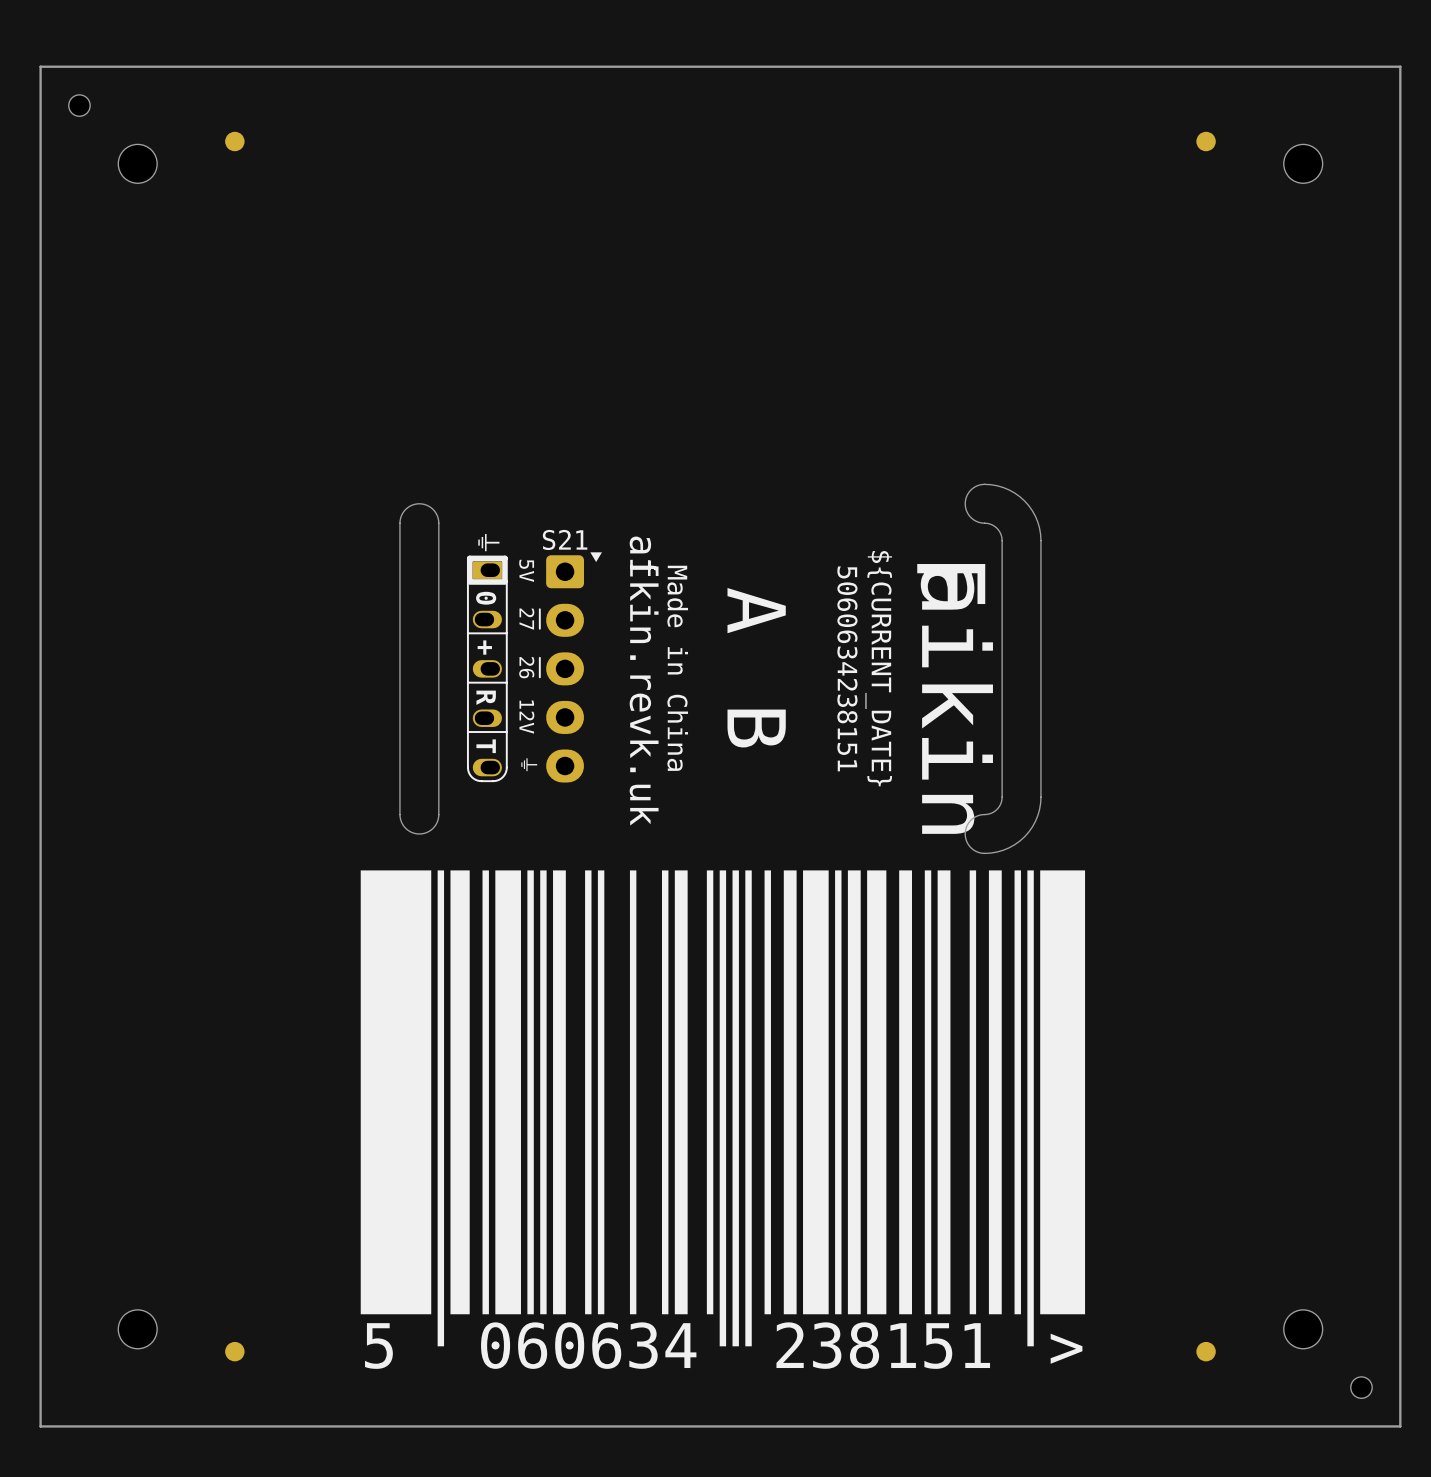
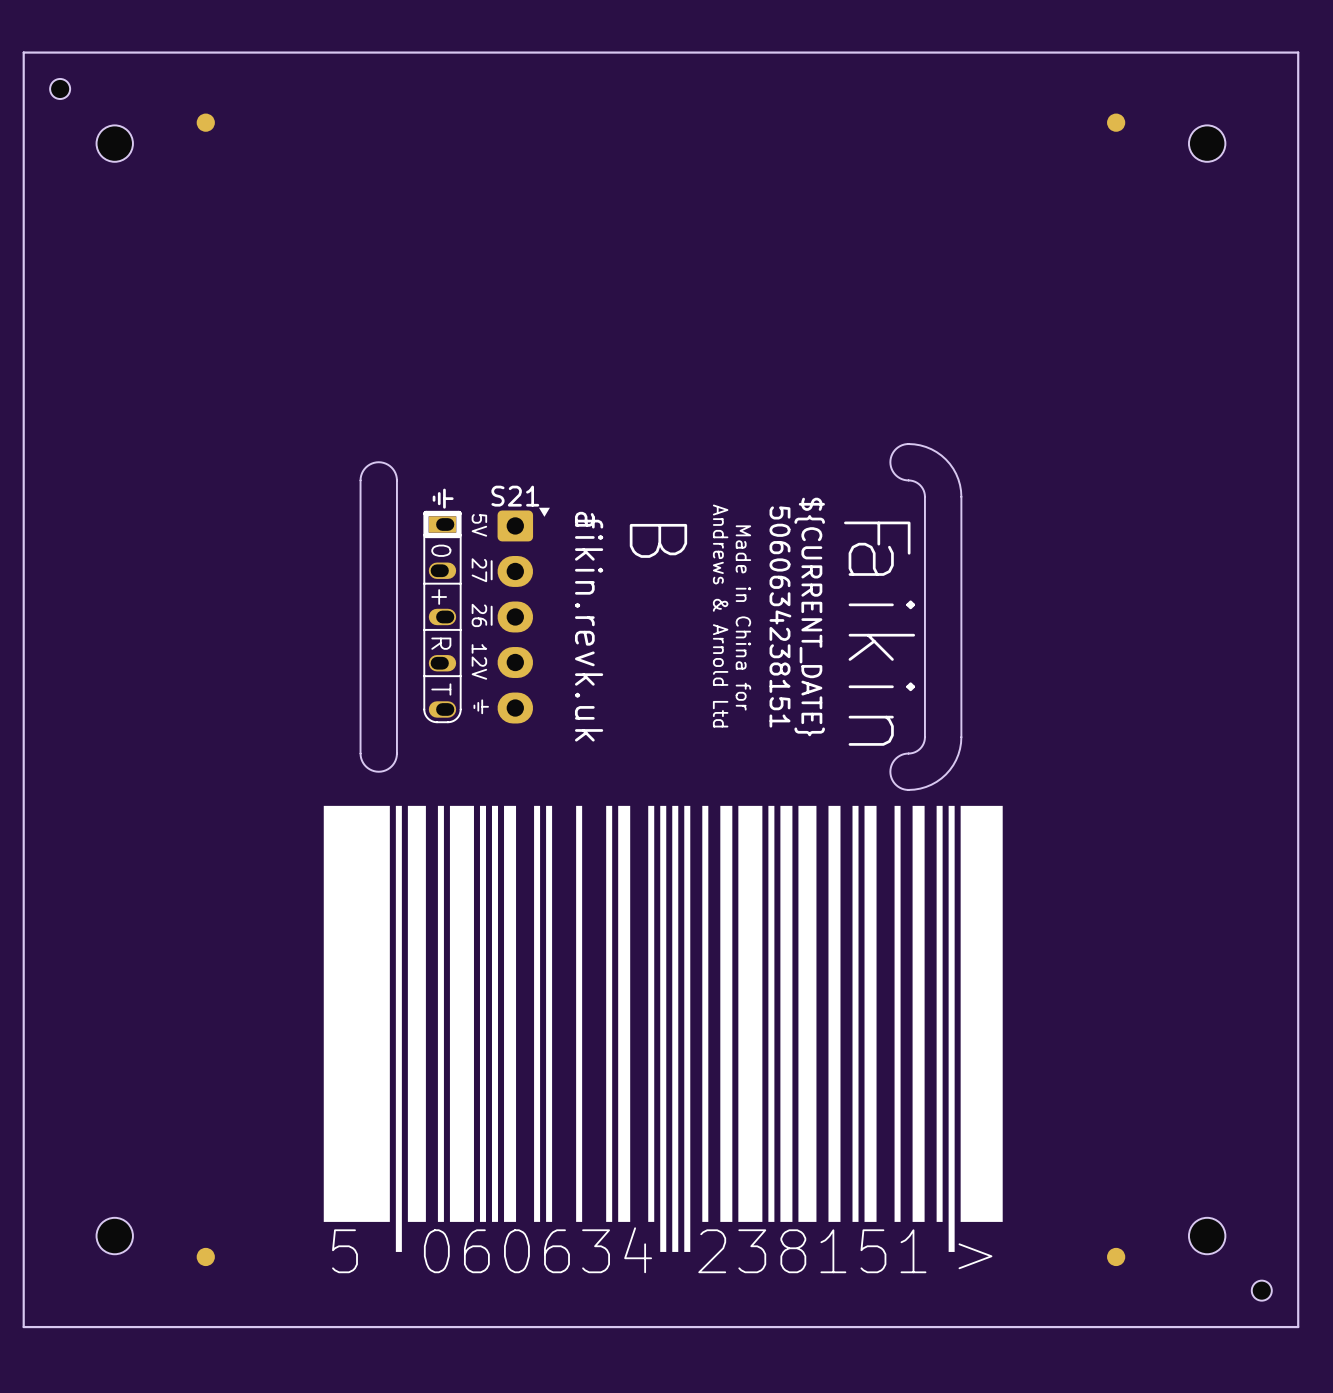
text: A (756, 610) -> none
text: Made in China (677, 668) -> none
text: none -> Andrews & Arnold Ltd (720, 616)
text: none -> Made in China for (743, 617)
text position: B (756, 728) -> B (658, 540)

